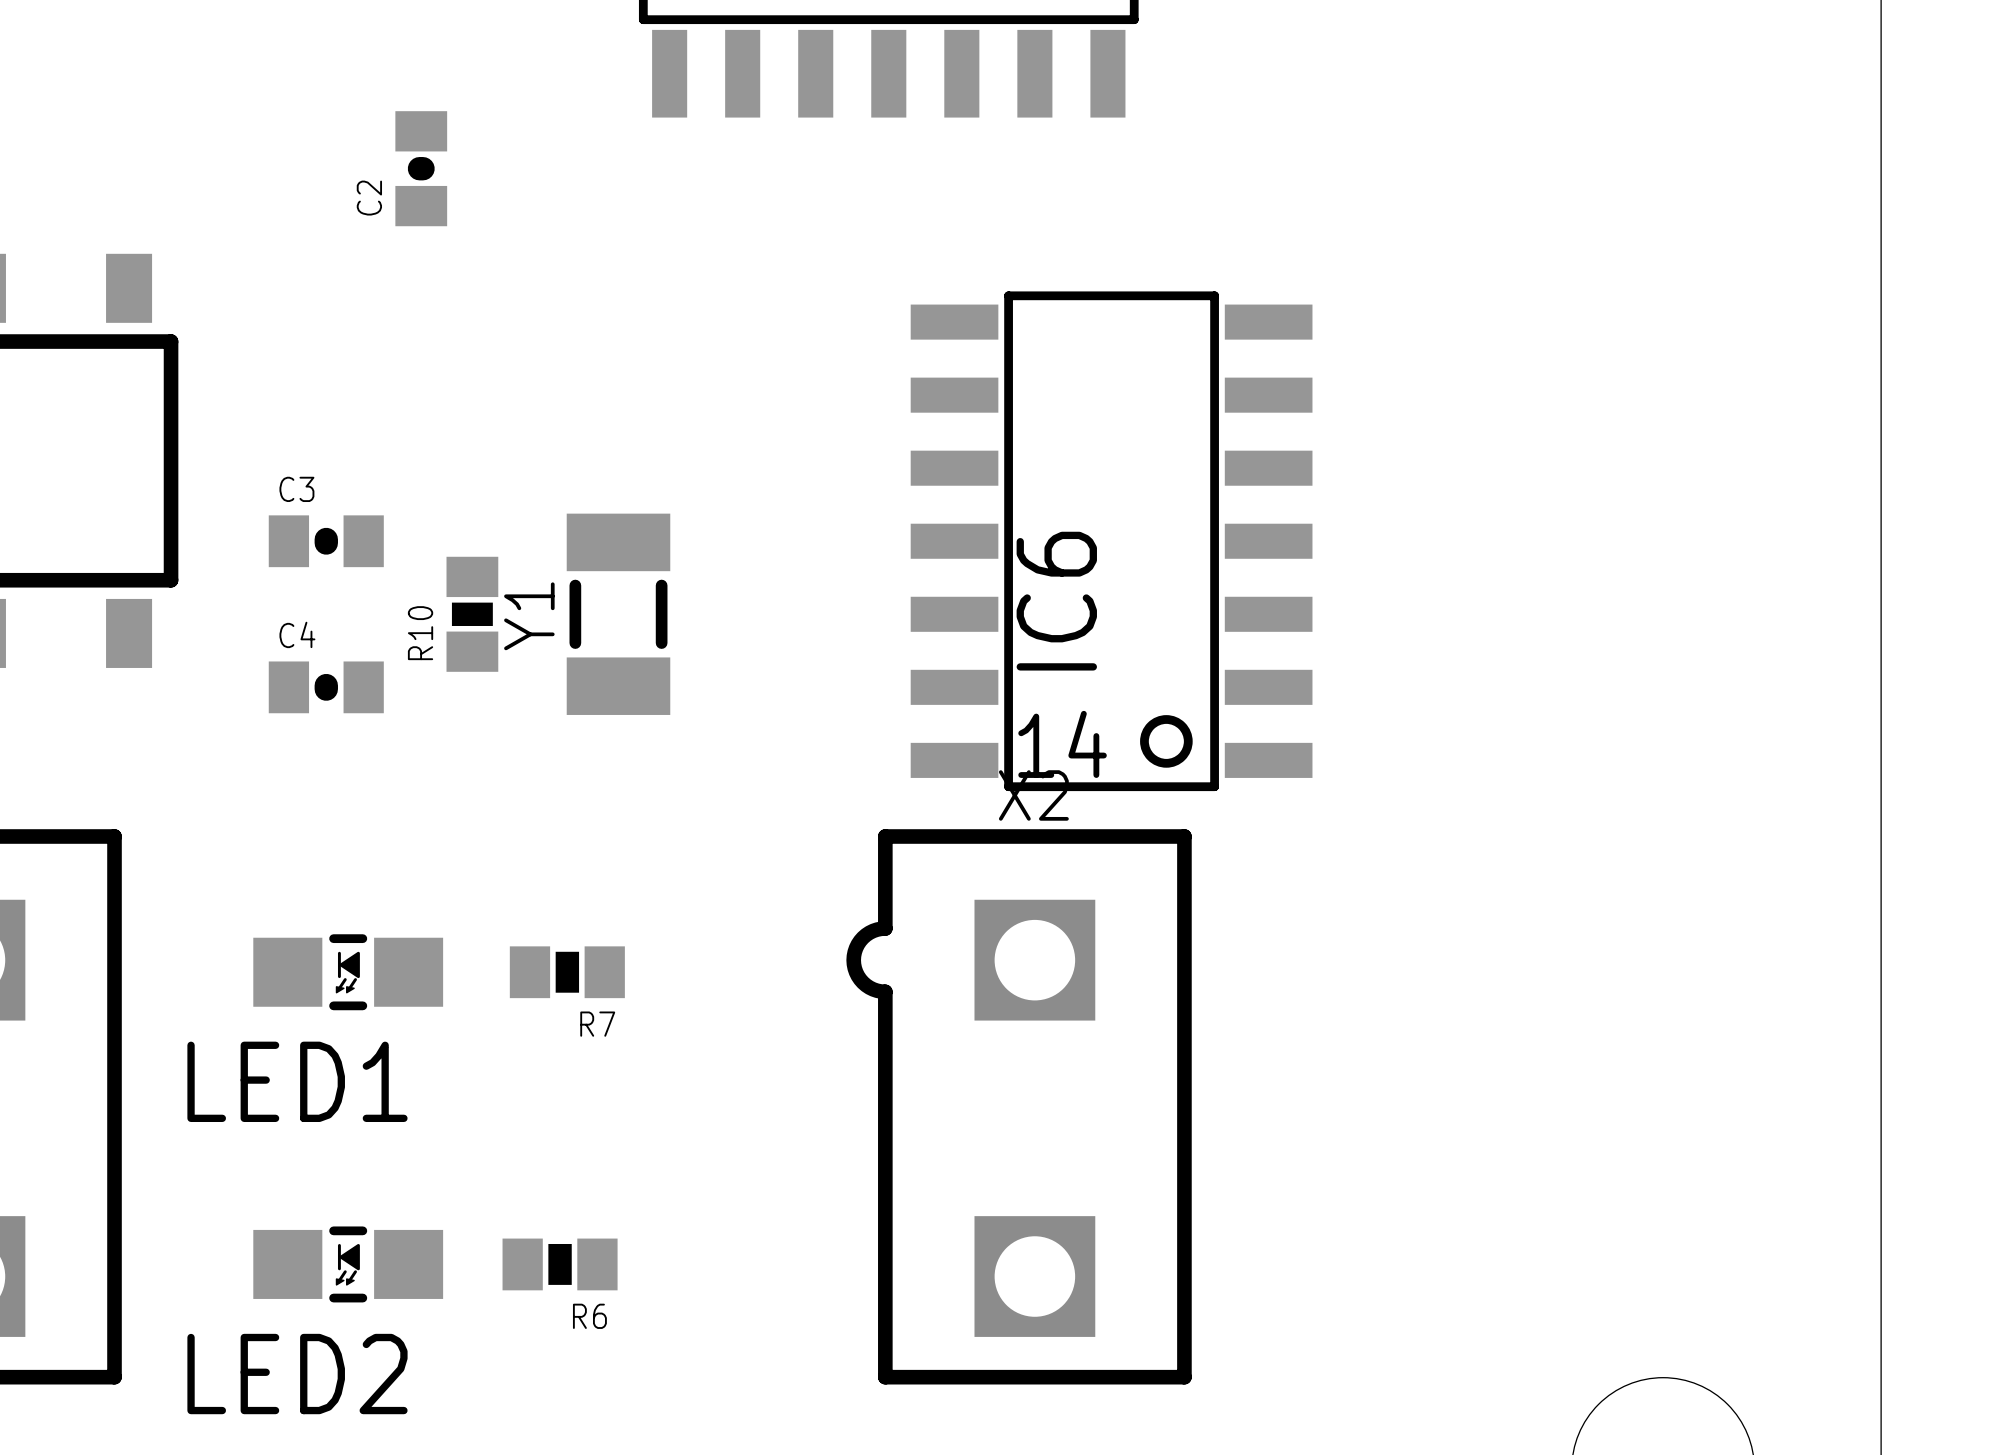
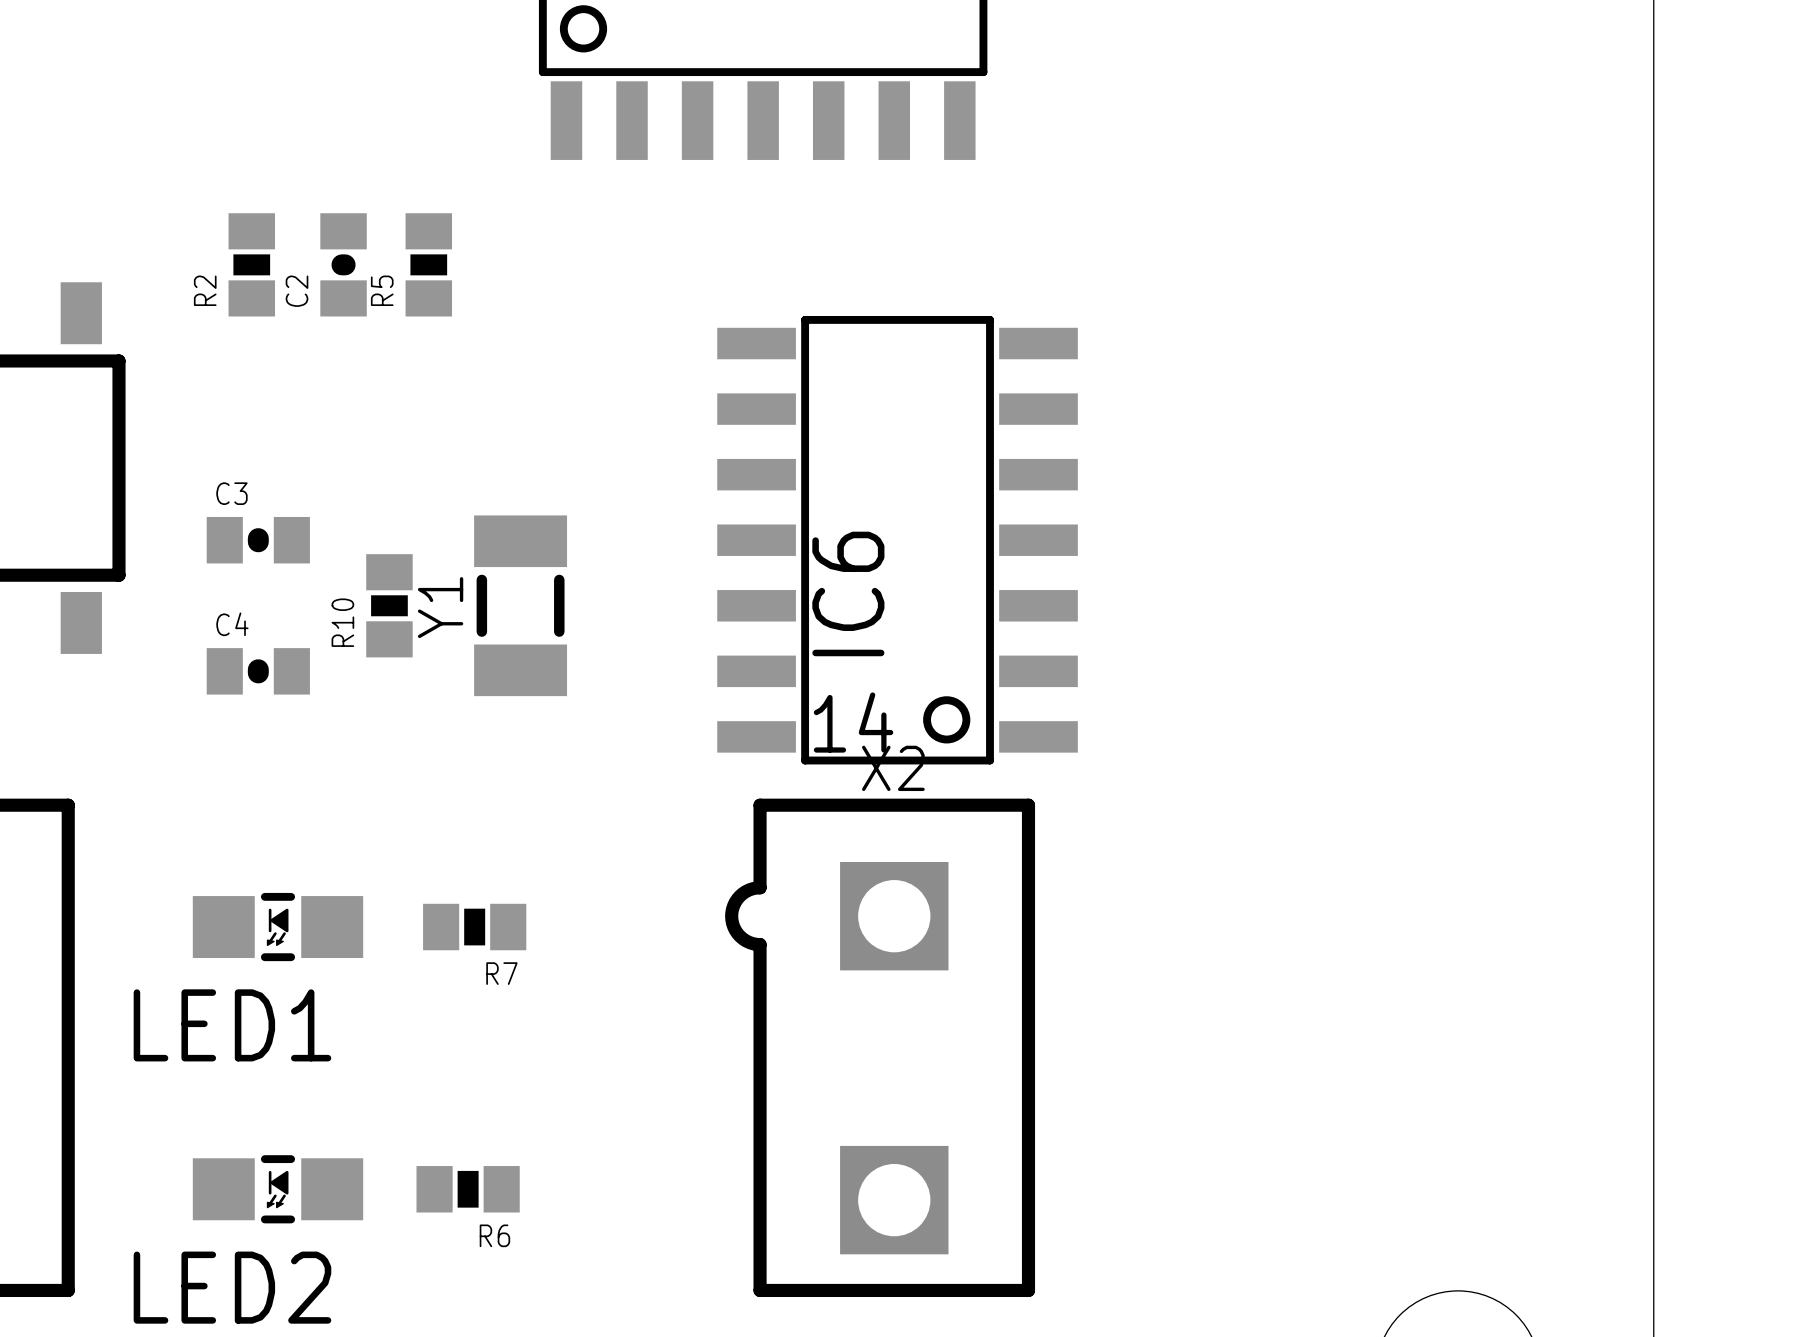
C2 position: (421, 168) -> (343, 264)
R2: none -> (251, 264)
R5: none -> (428, 264)
IC6 position: (1111, 541) -> (897, 540)

